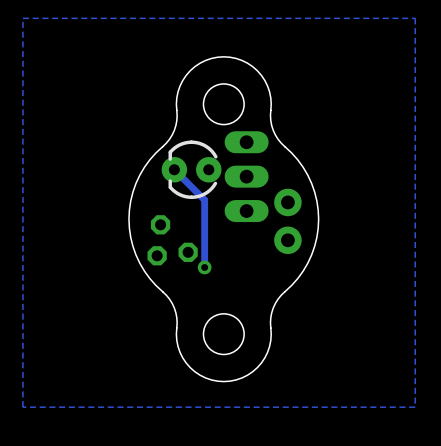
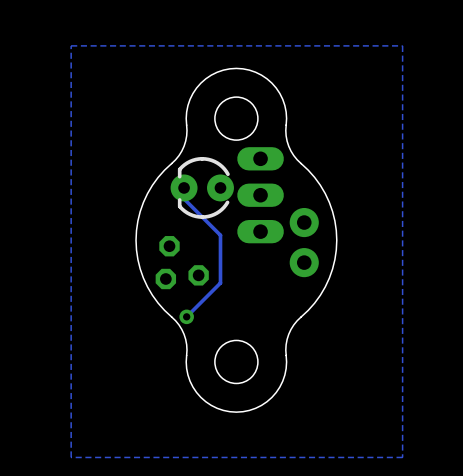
zone outline: (415, 18) (415, 407) (22, 407) (22, 18) (415, 18) -> (402, 45) (402, 457) (71, 457) (71, 45) (402, 45)
track: (174, 169) (204, 200) (204, 267) -> (184, 187) (180, 191) (180, 195) (220, 235) (220, 283) (186, 316)
via position: (204, 267) -> (186, 316)

